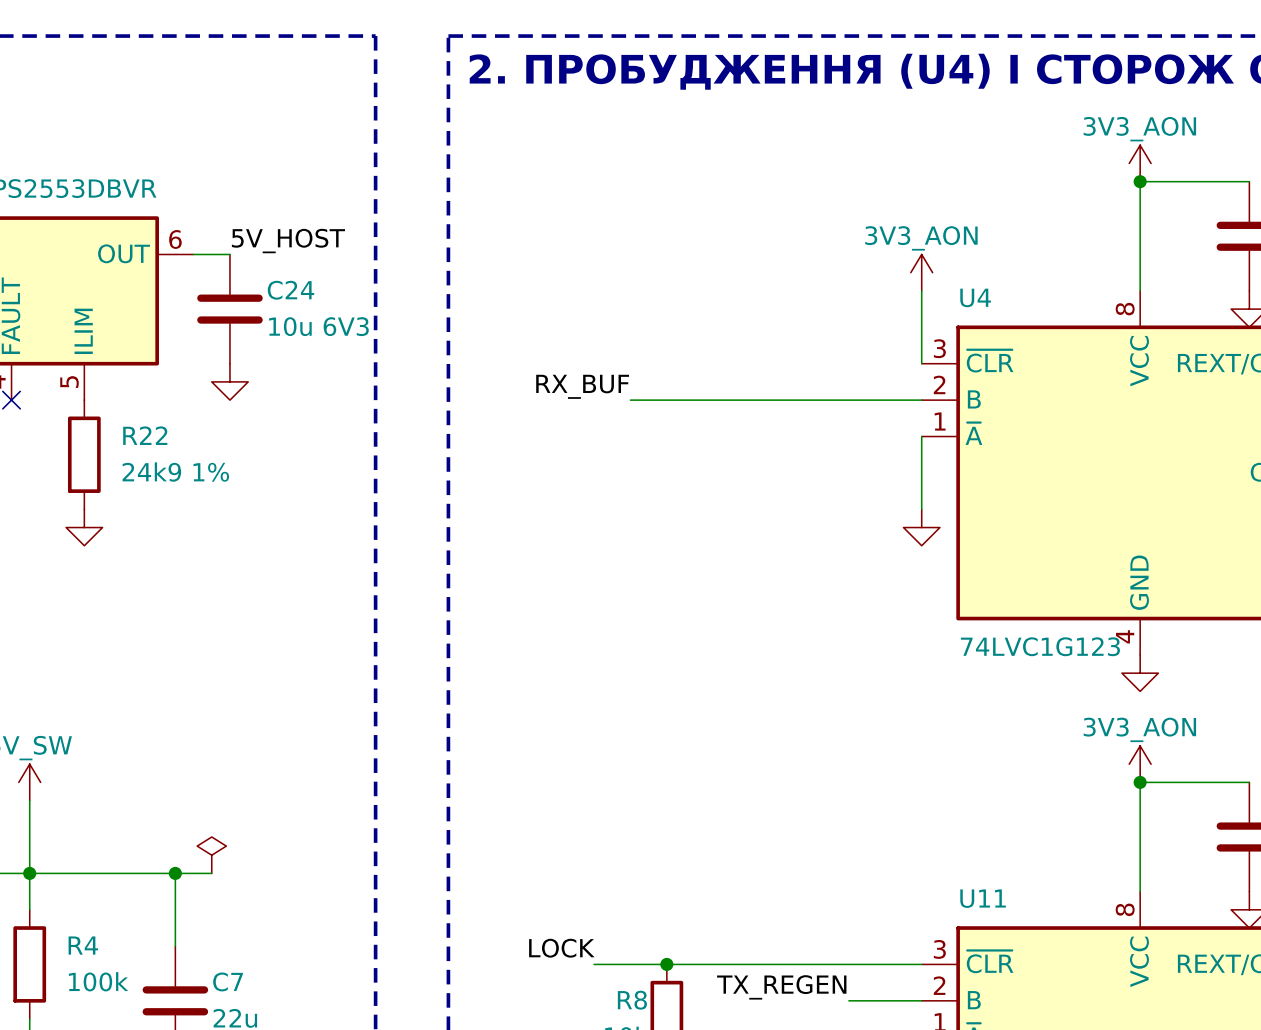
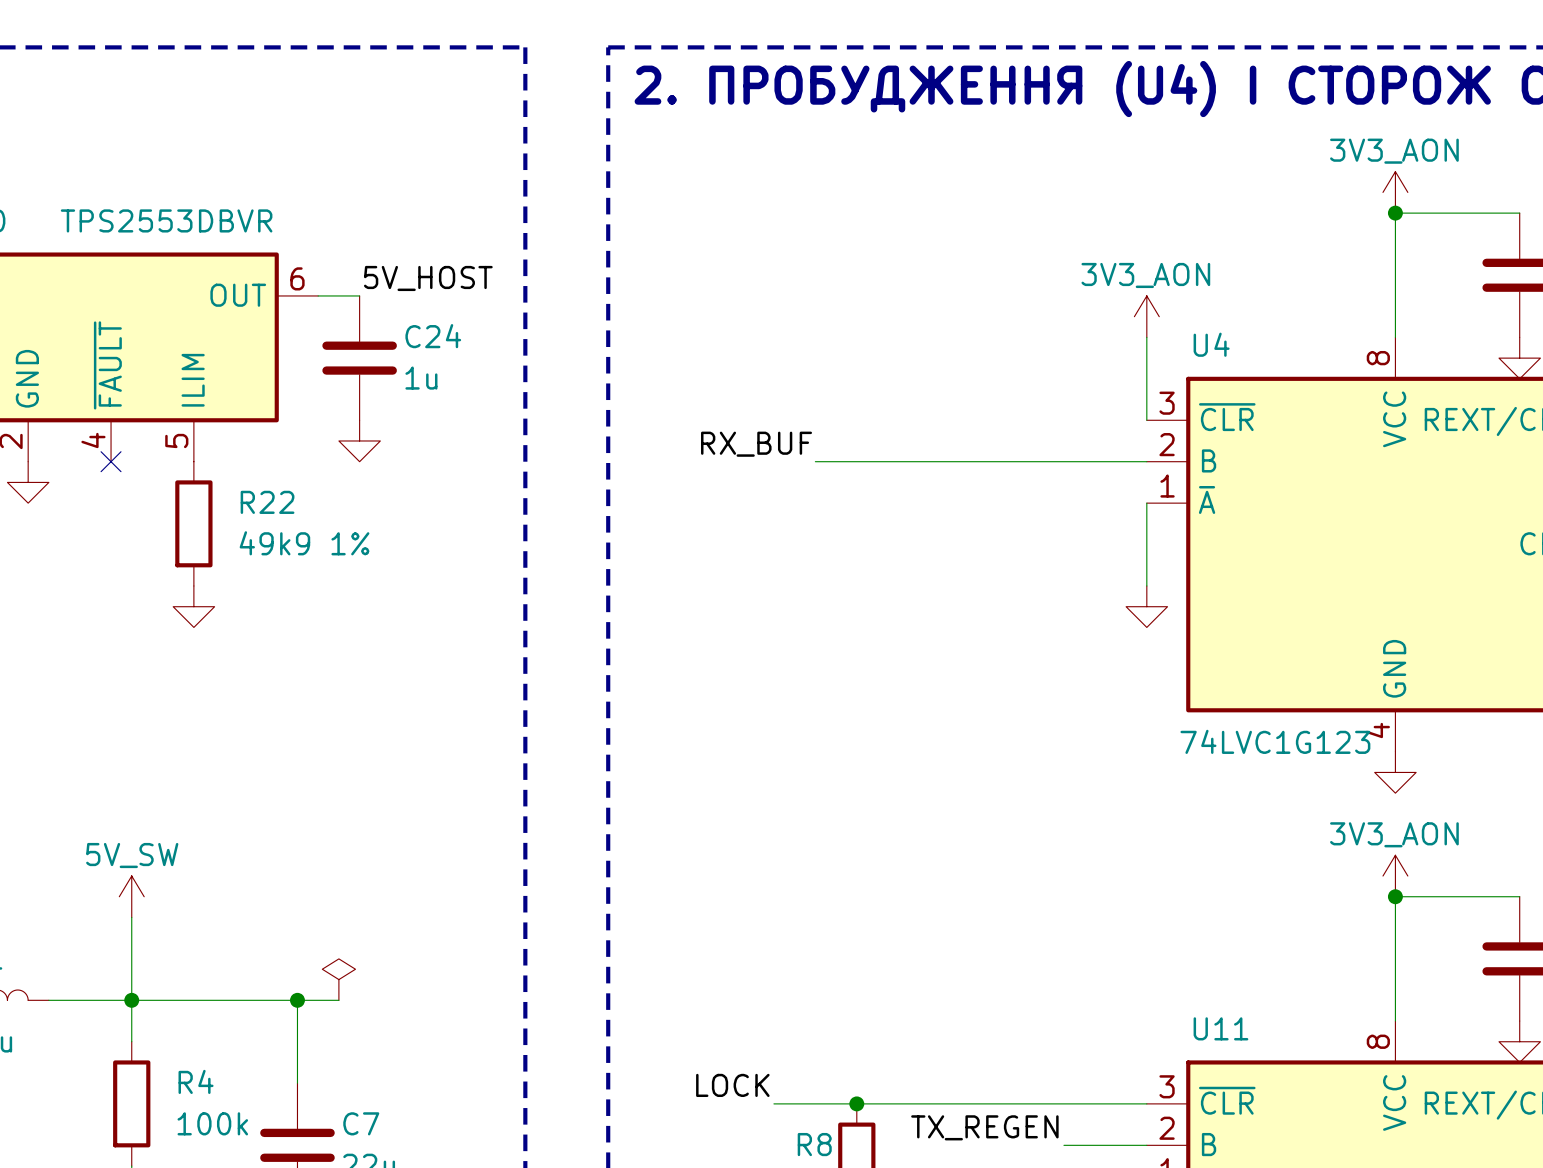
C24 value: 10u 6V3 (318, 326) -> 1u (421, 378)
R22 value: 24k9 1% (175, 472) -> 49k9 1% (304, 543)

